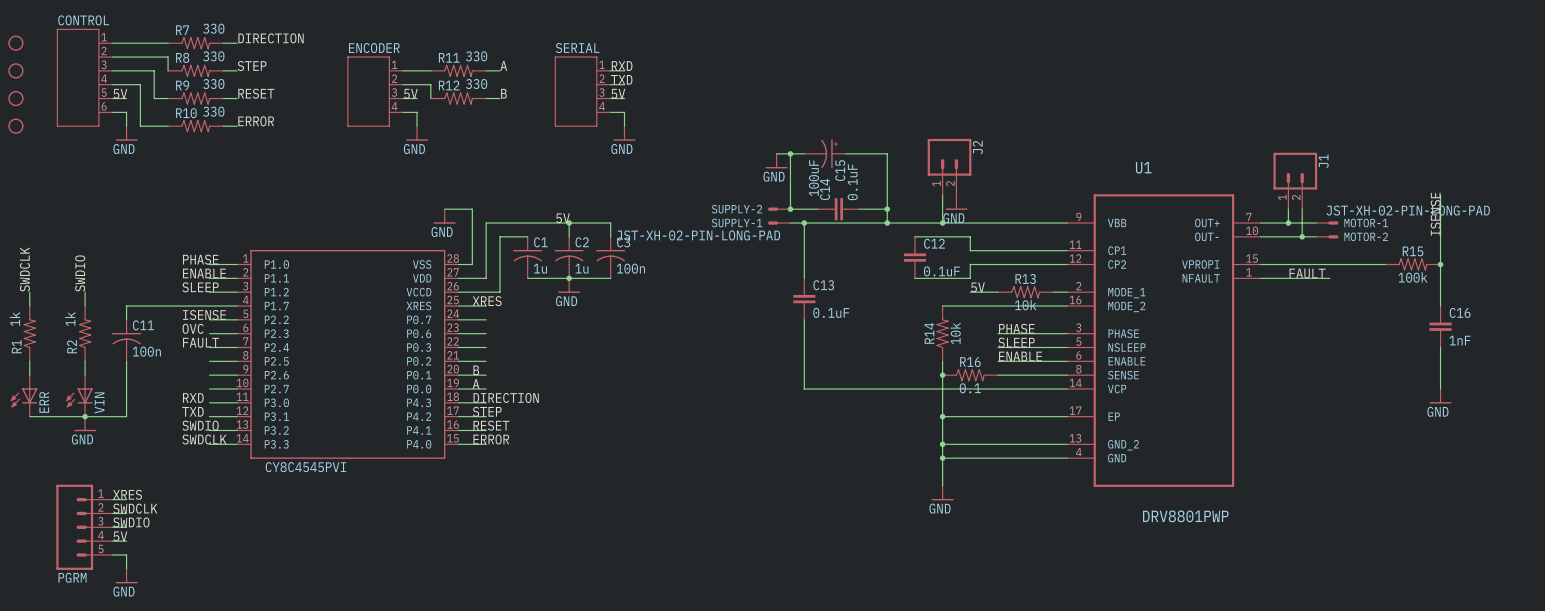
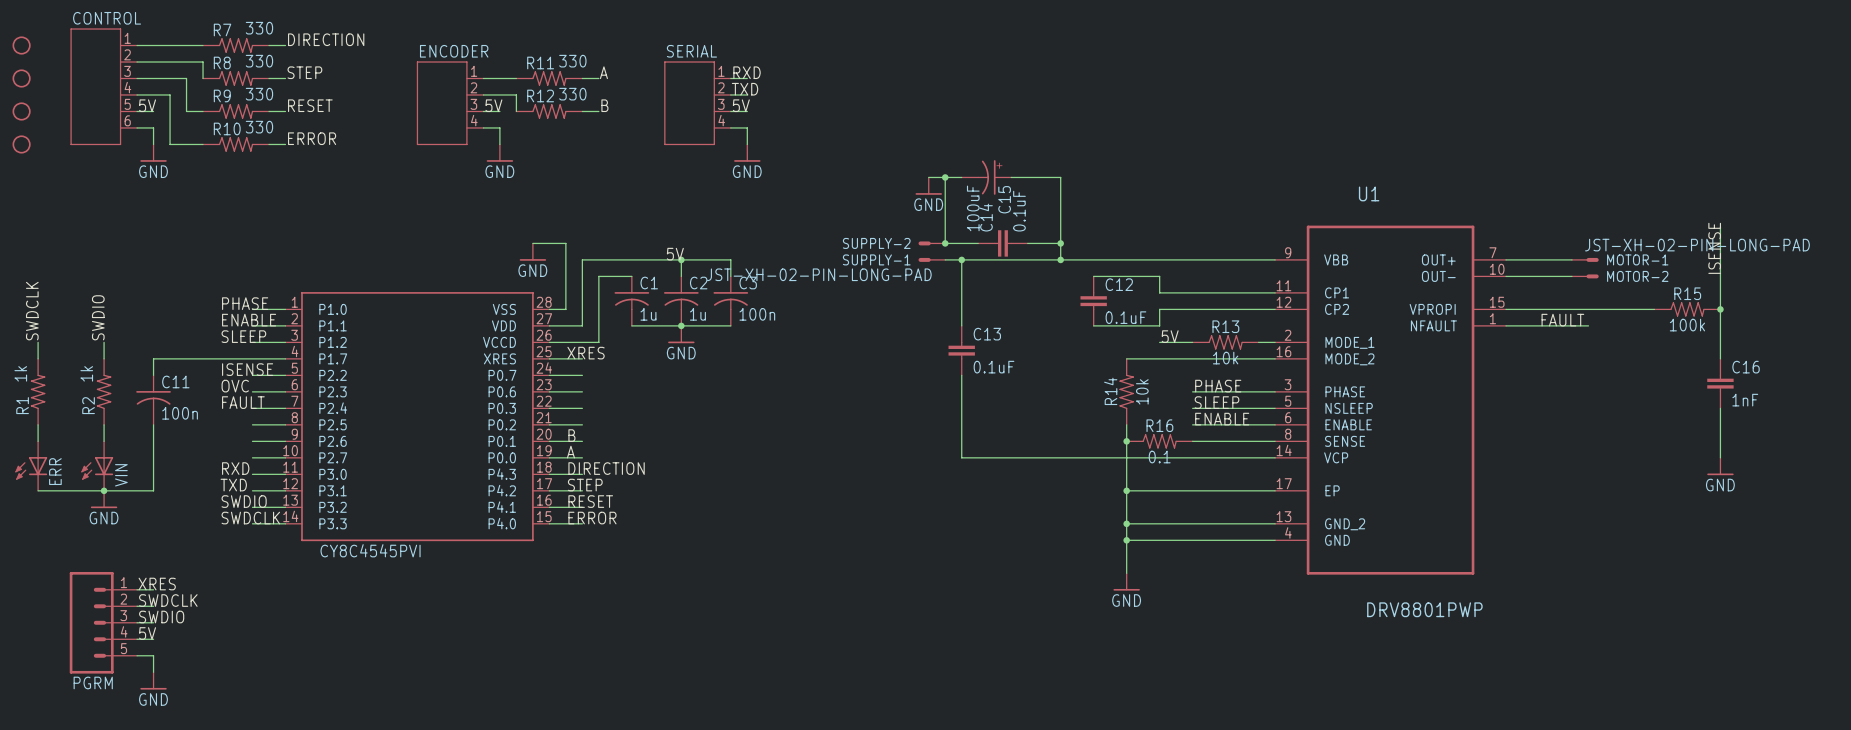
J2: (949, 167) -> none
J1: (1295, 180) -> none
wire: (942, 195) (942, 223) -> none
power symbol: GND (956, 202) -> none
wire: (1288, 209) (1288, 223) -> none
wire: (1302, 209) (1302, 236) -> none
junction: (942, 223) -> none
junction: (1288, 223) -> none
junction: (1302, 236) -> none

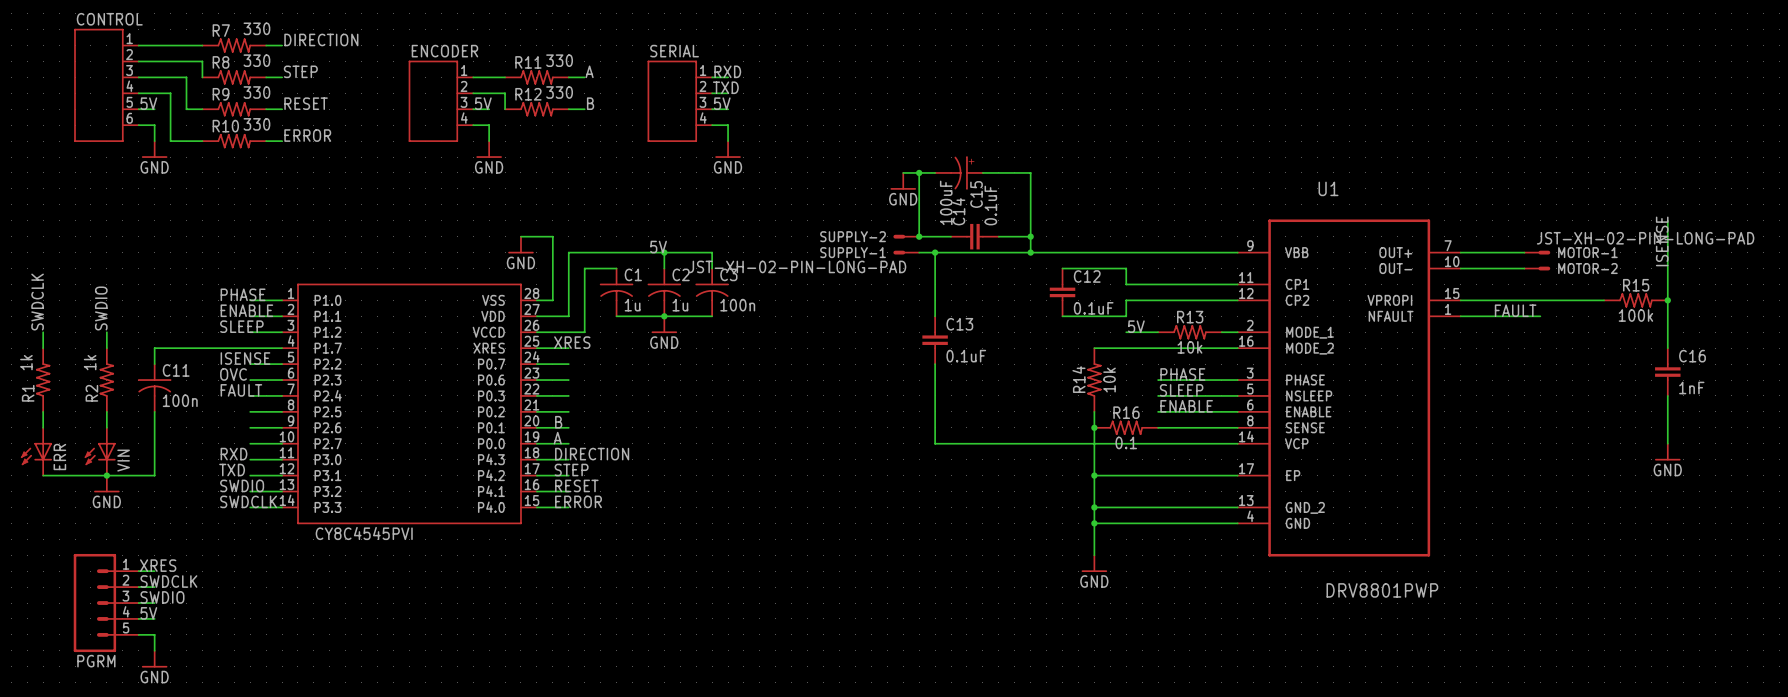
part: (21, 45) -> none
part: (21, 78) -> none
part: (21, 111) -> none
part: (21, 144) -> none

